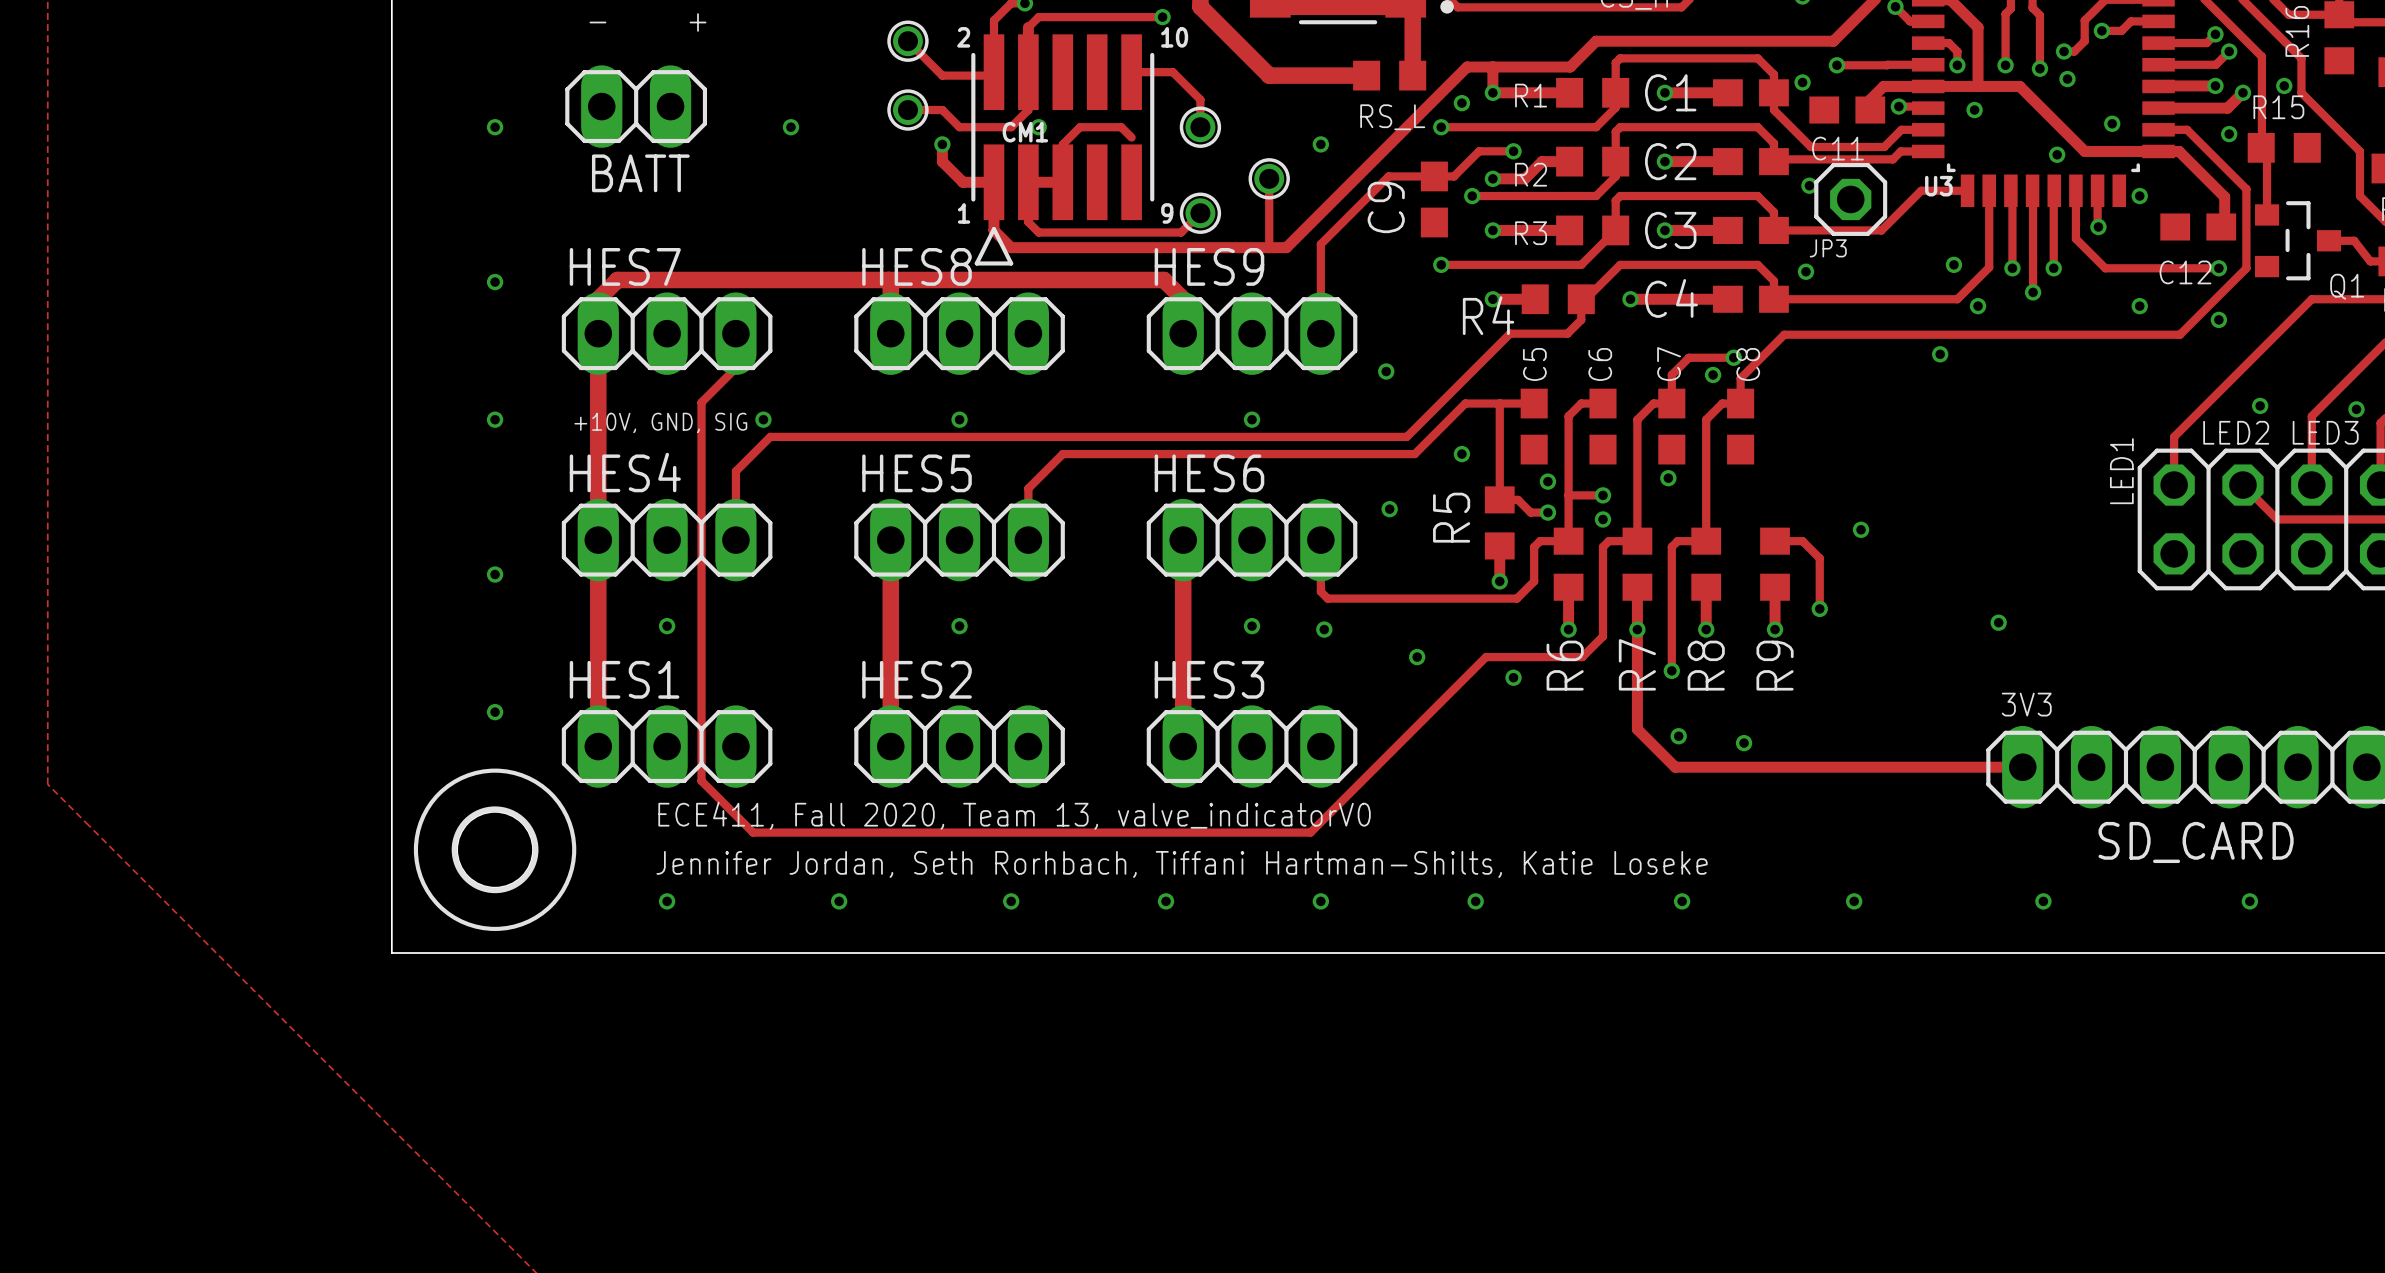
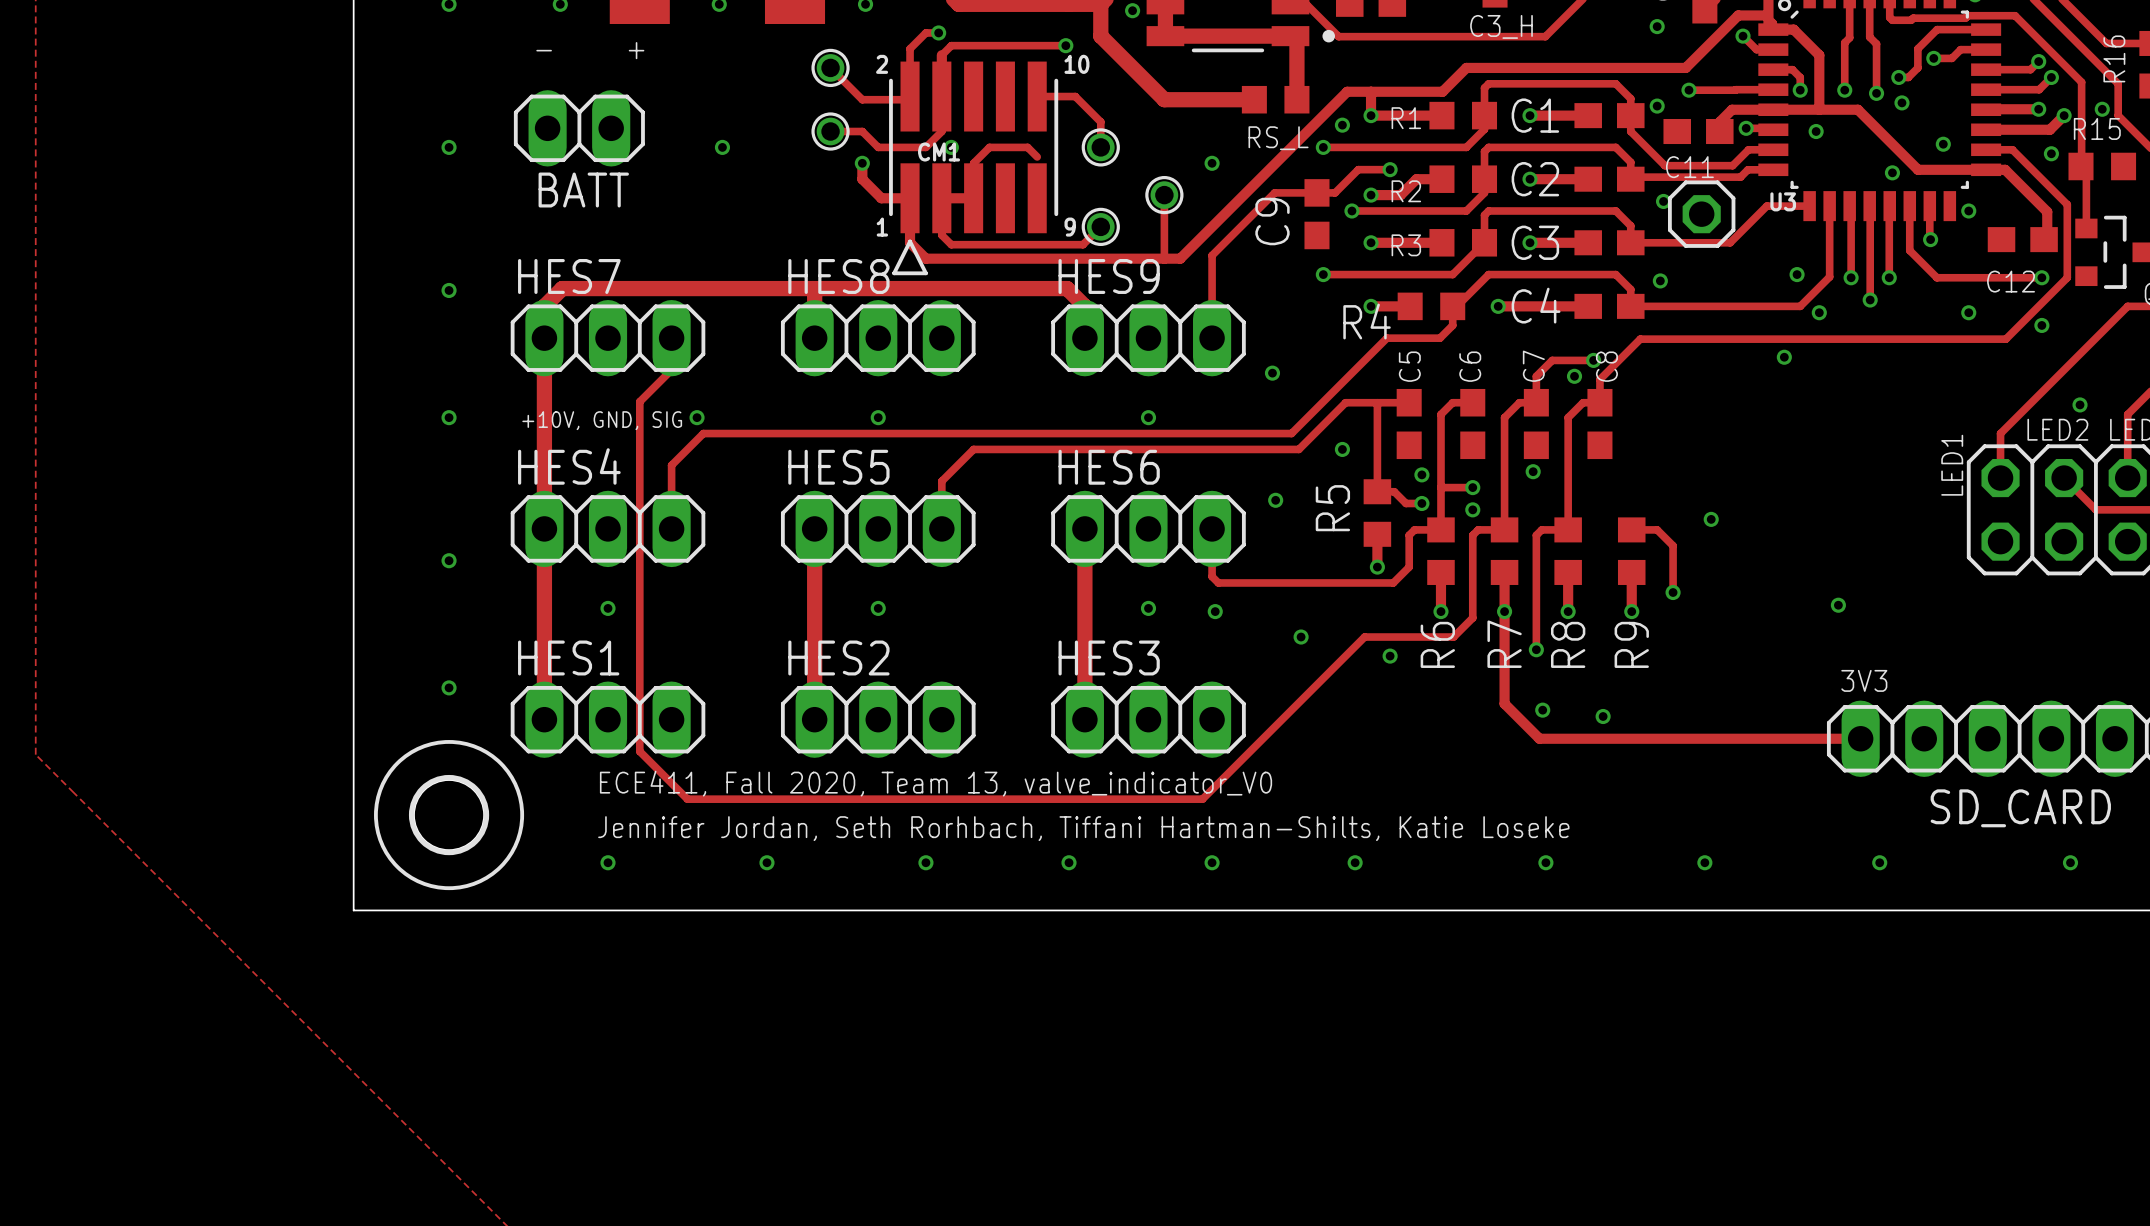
JP3 name: JP3 (1828, 248) -> none
text: ECE411, Fall 2020, Team 13, valve_indicatorV0 (1014, 815) -> ECE411, Fall 2020, Team 13, valve_indicator_V0 (936, 783)

